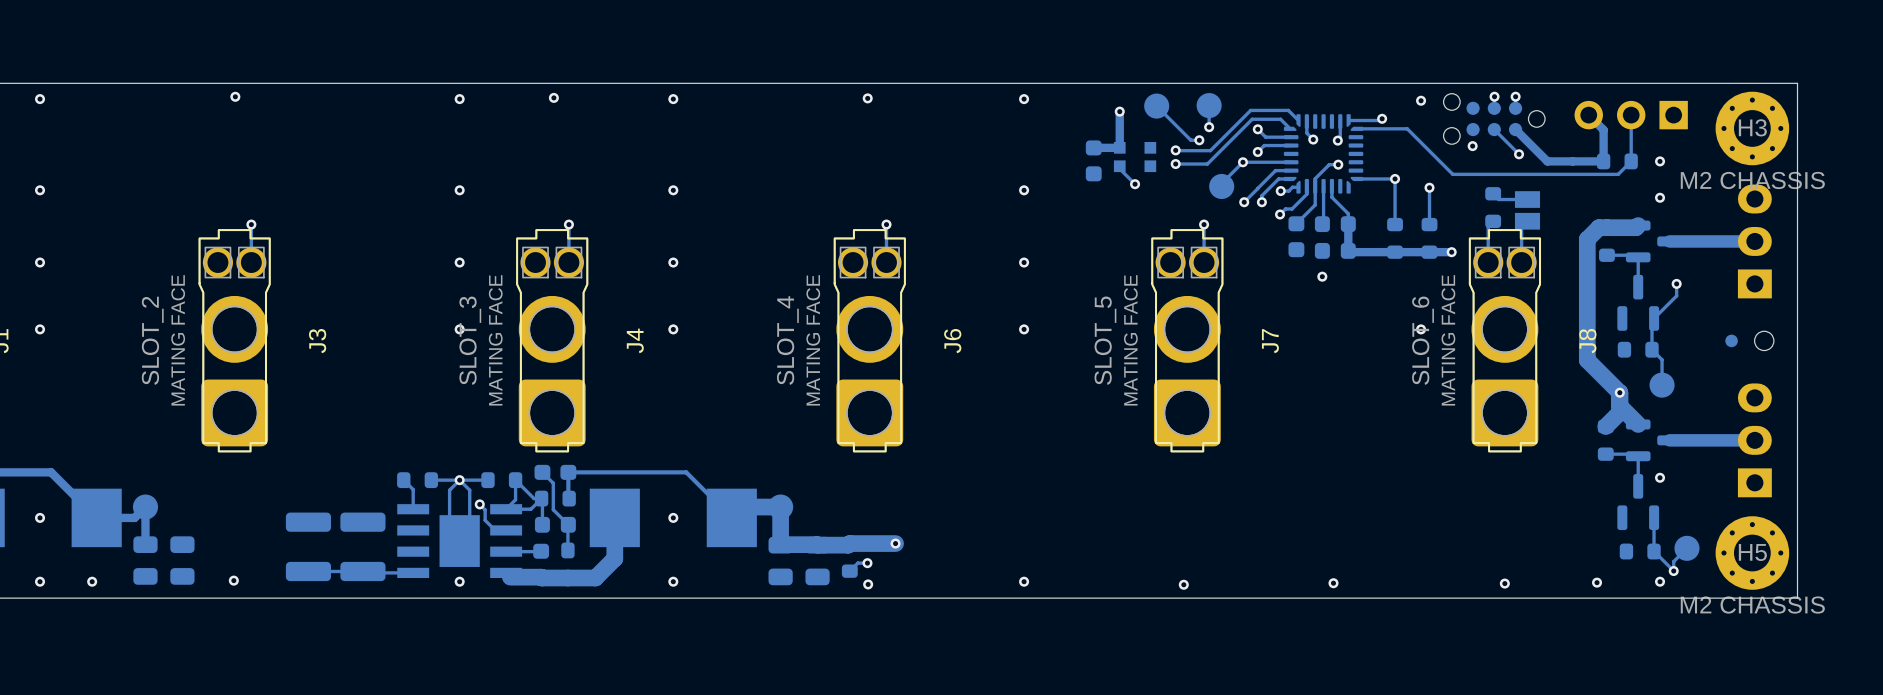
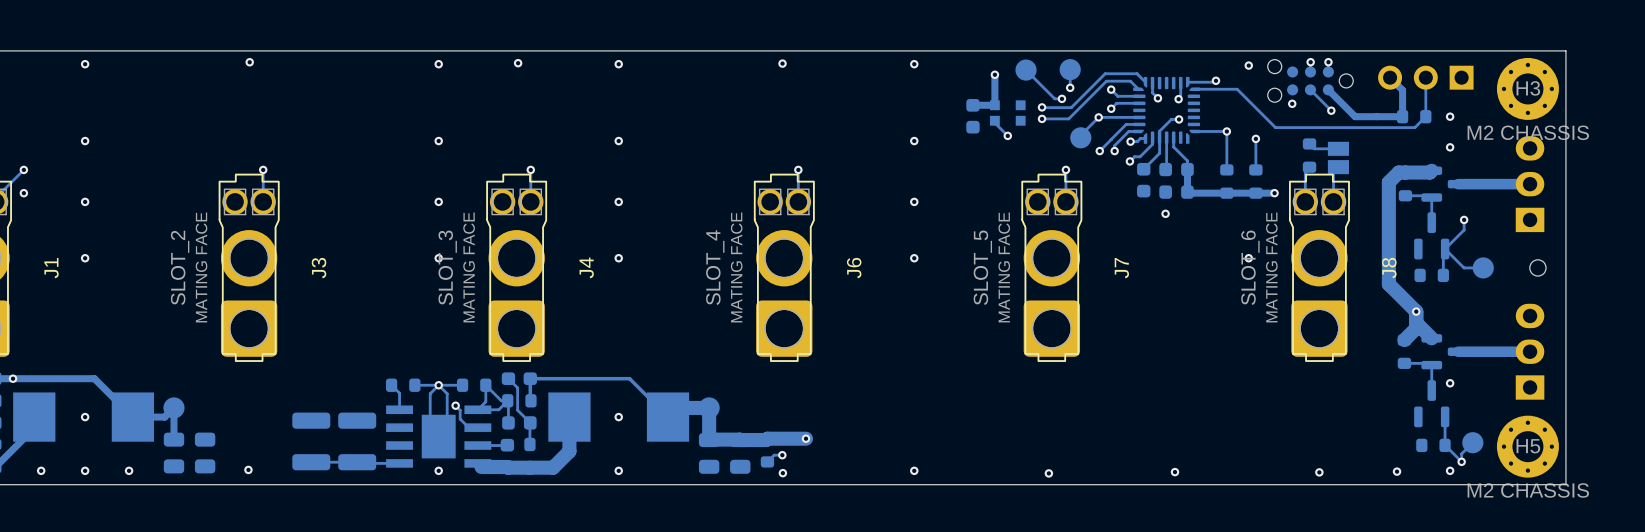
bottom track: none -> (1445, 249) (1464, 267) (1483, 267)
part: (1731, 340) -> none
bottom track: (1652, 349) (1662, 359) (1662, 385) -> none
part position: (1662, 385) -> (1483, 267)

